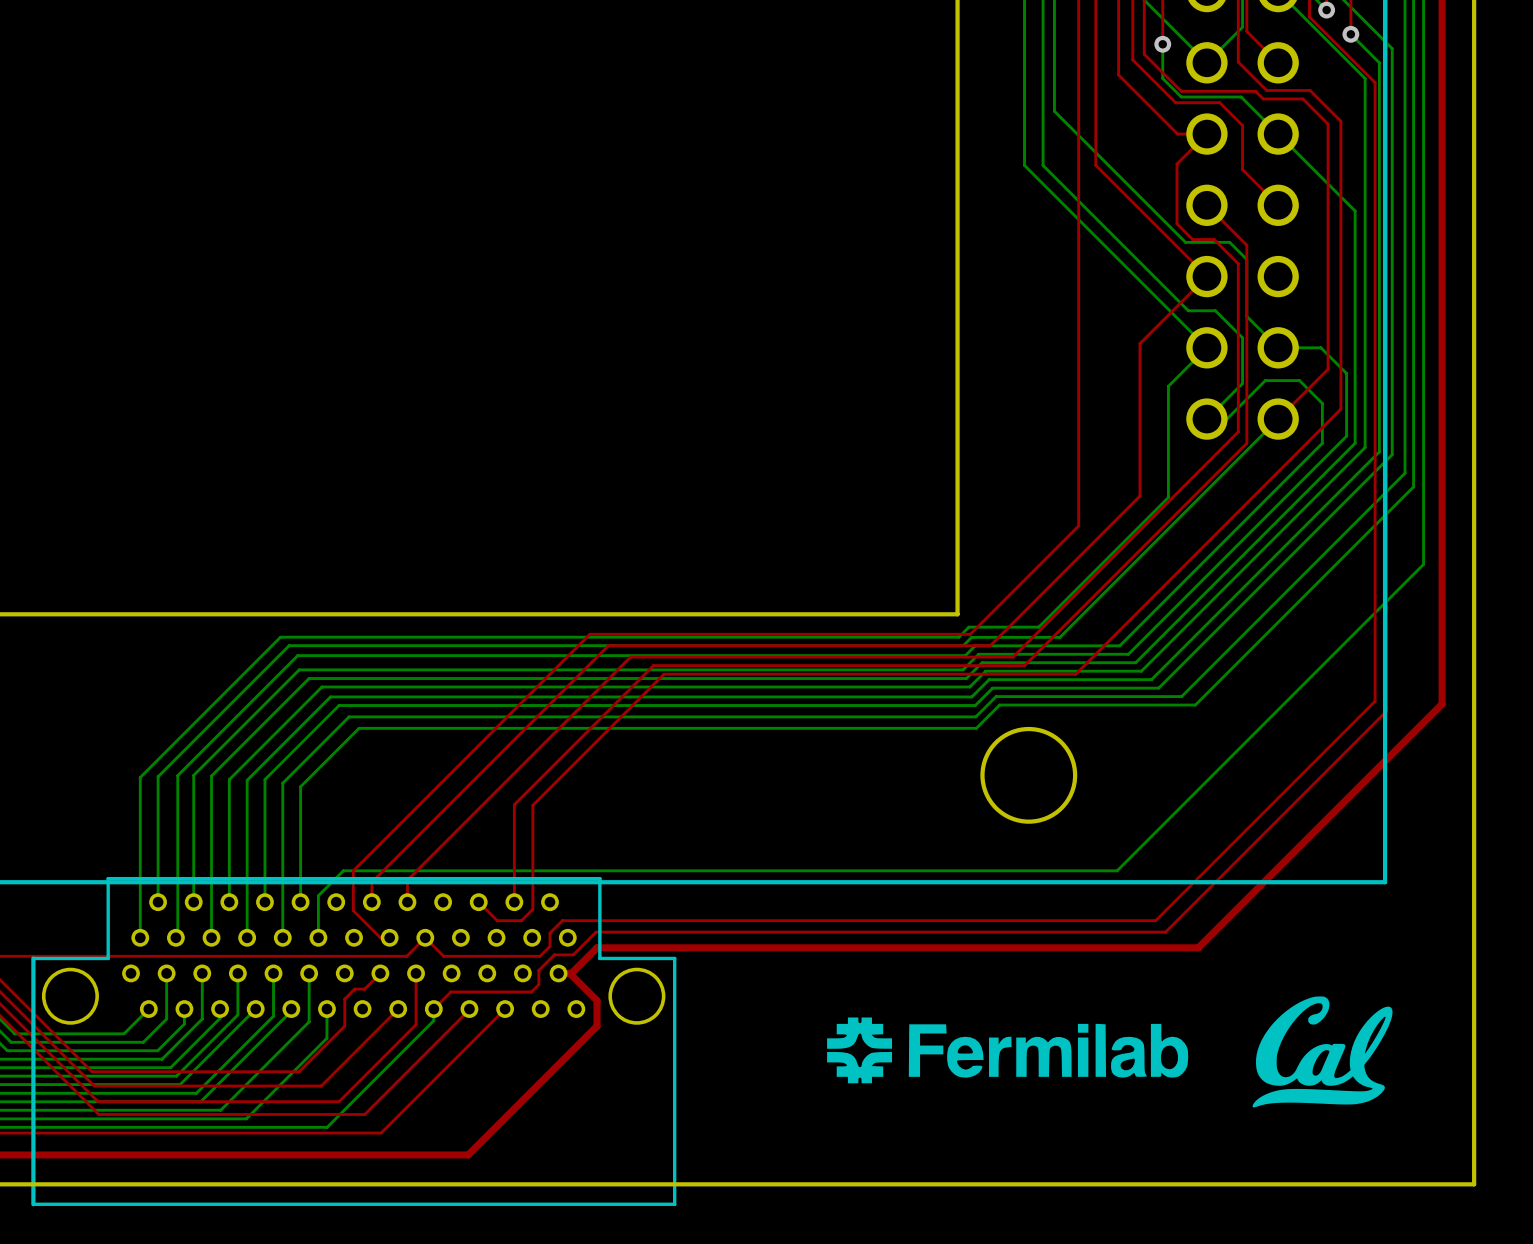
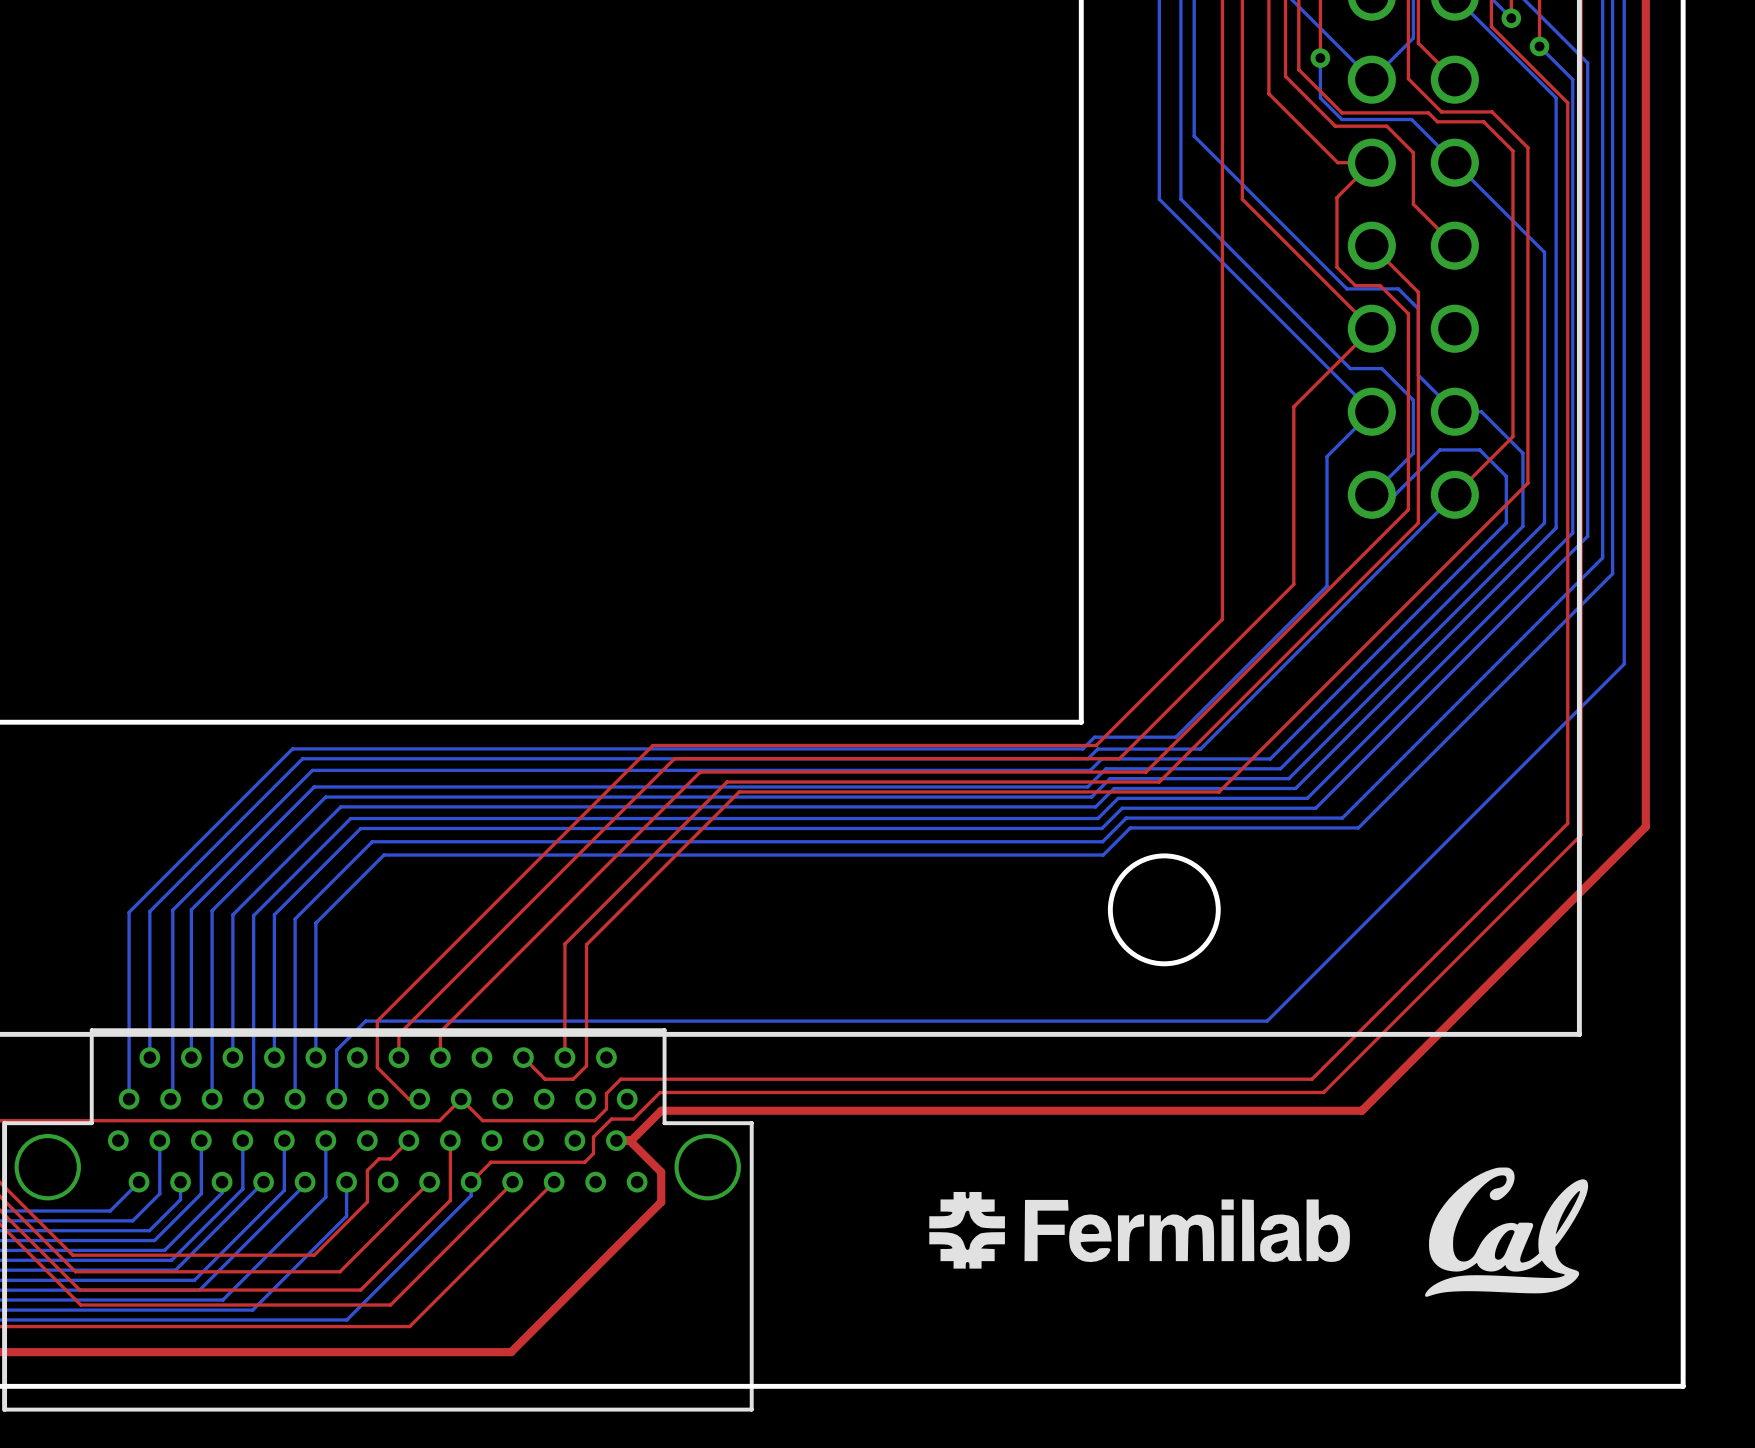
bottom track: (1300, 347) (1320, 347) (1346, 373) (1346, 436) (1336, 446) -> (1481, 411) (1522, 453) (1522, 526)

